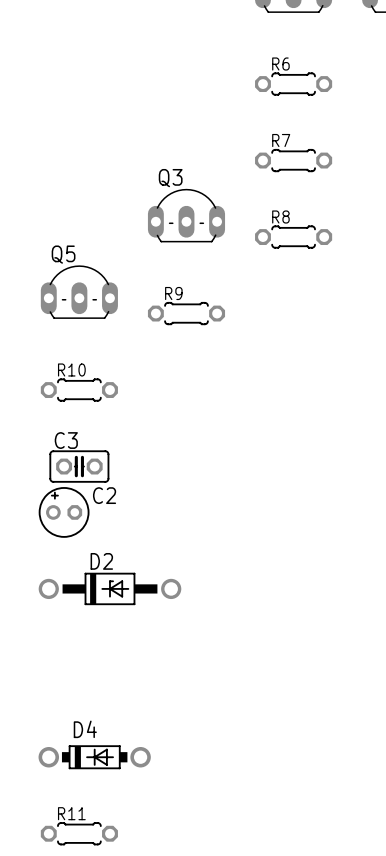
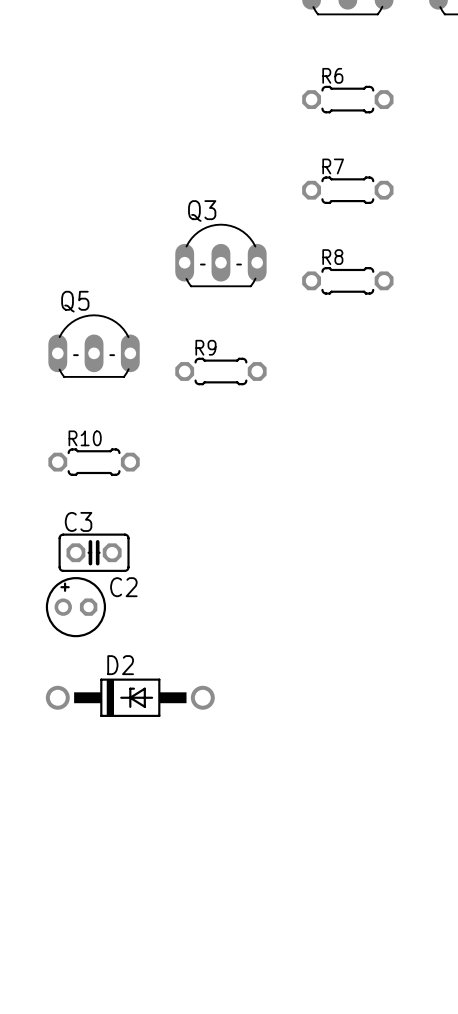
D4: (94, 757) -> none
R11: (79, 833) -> none

